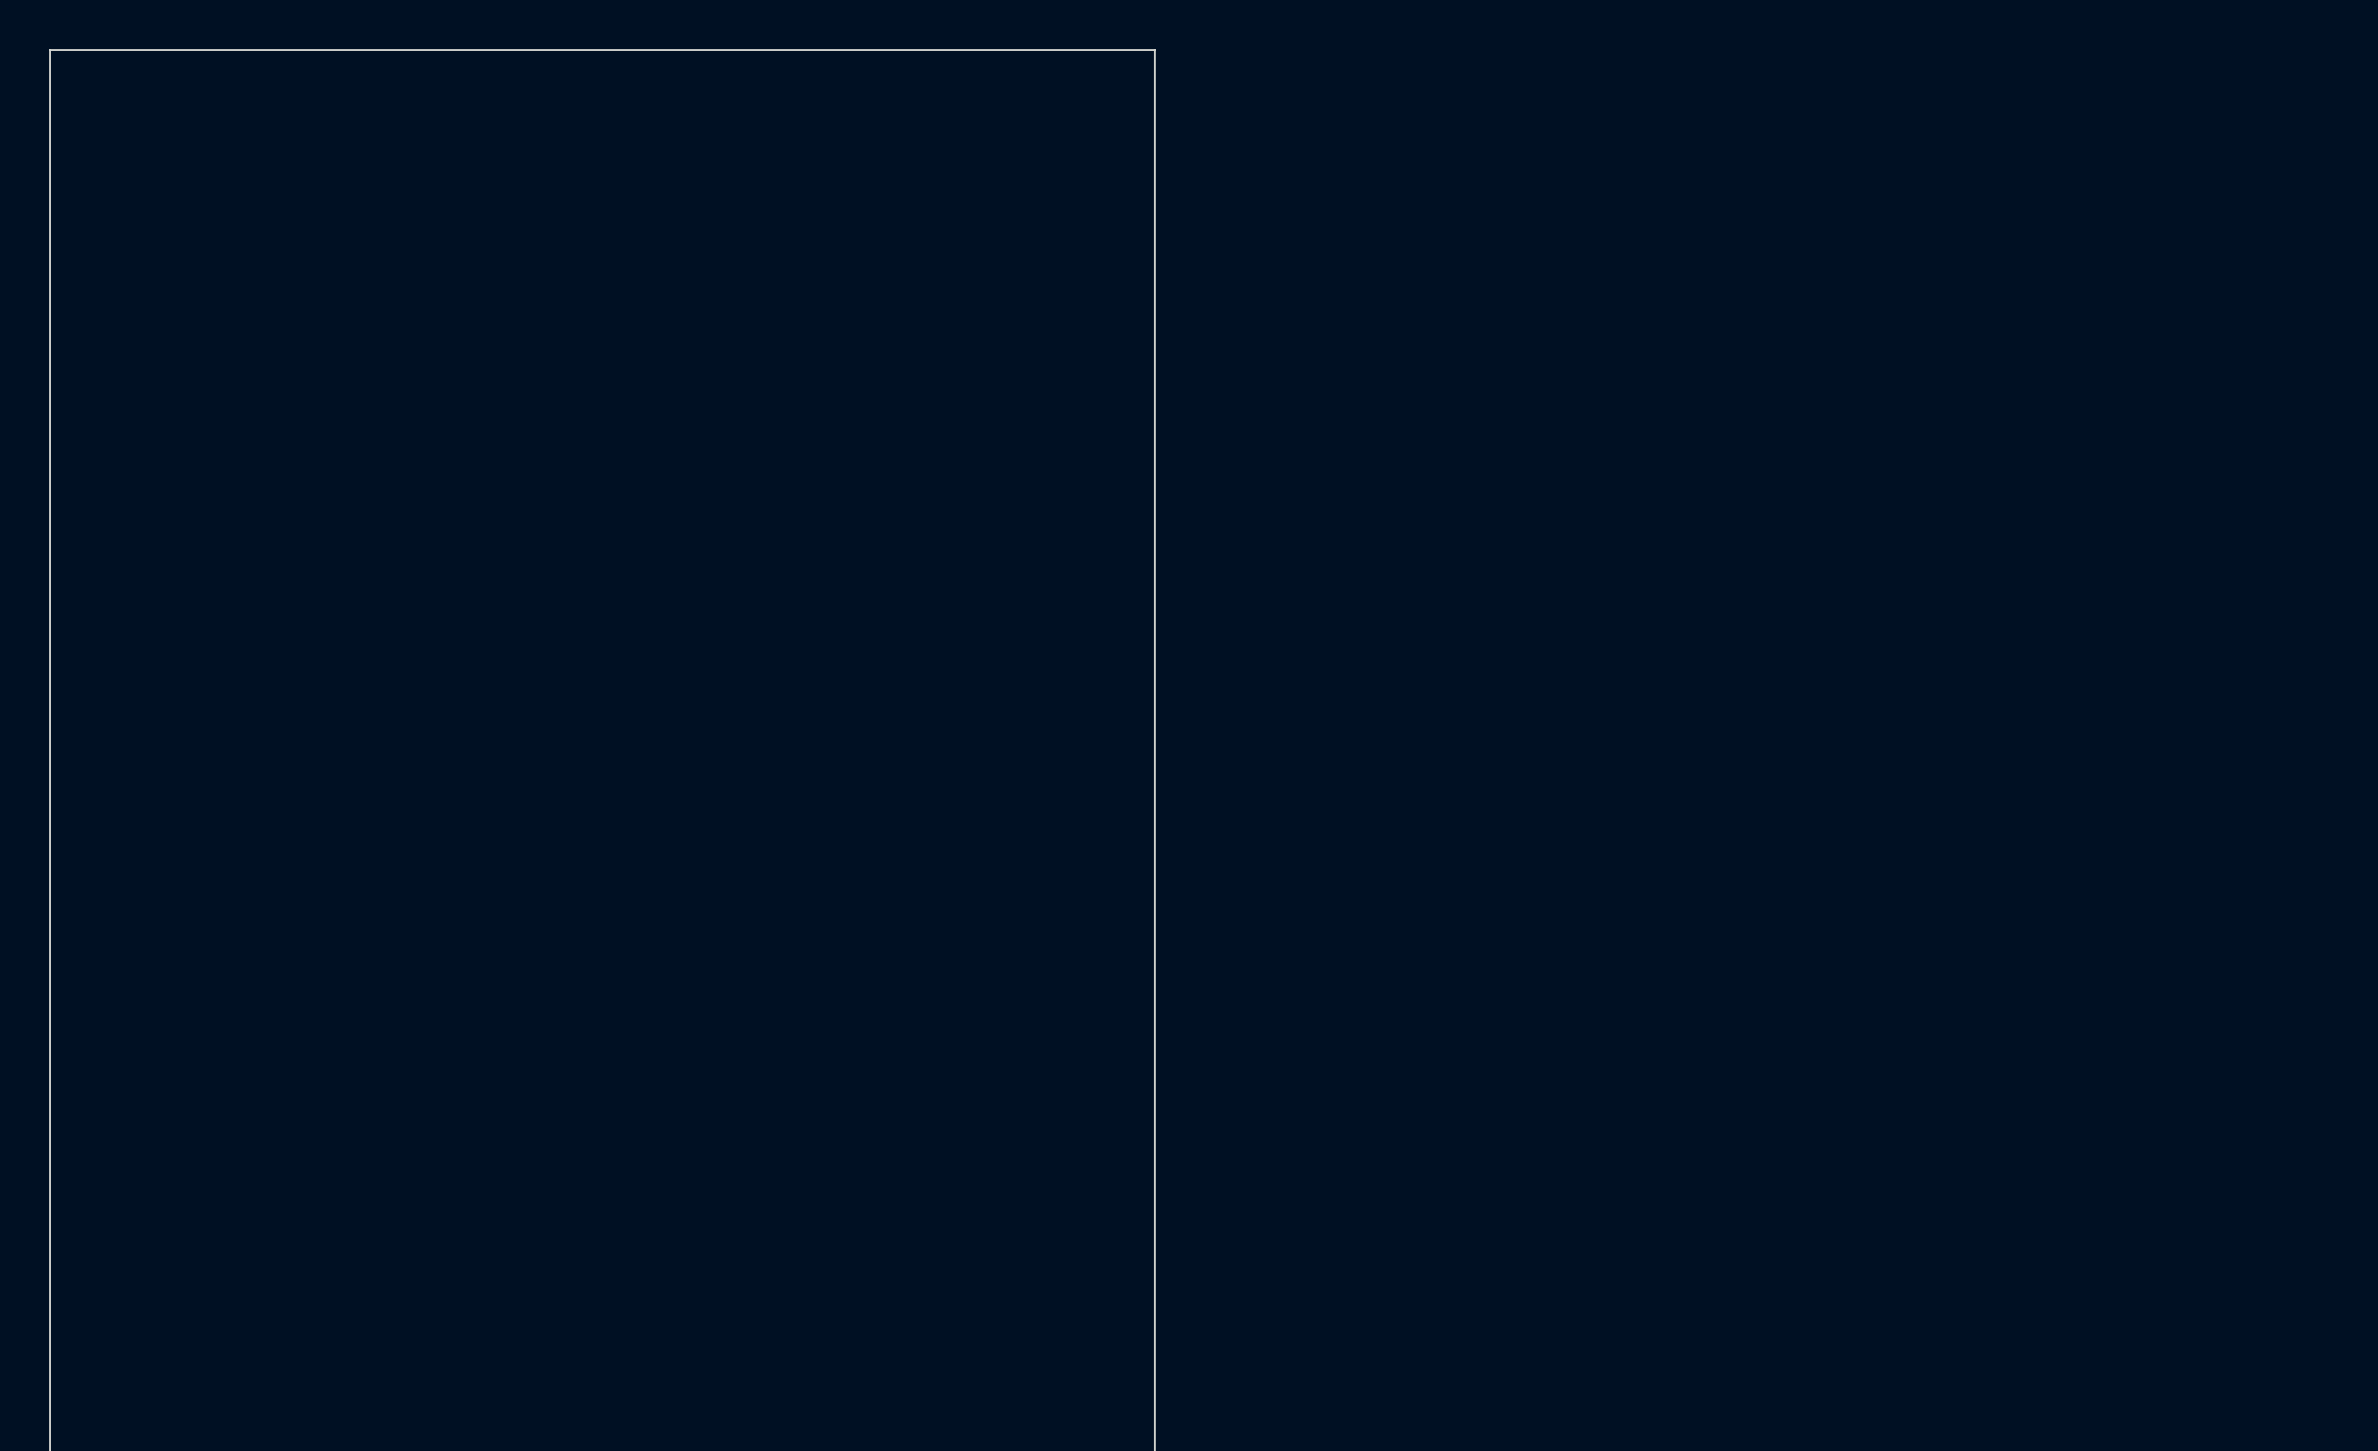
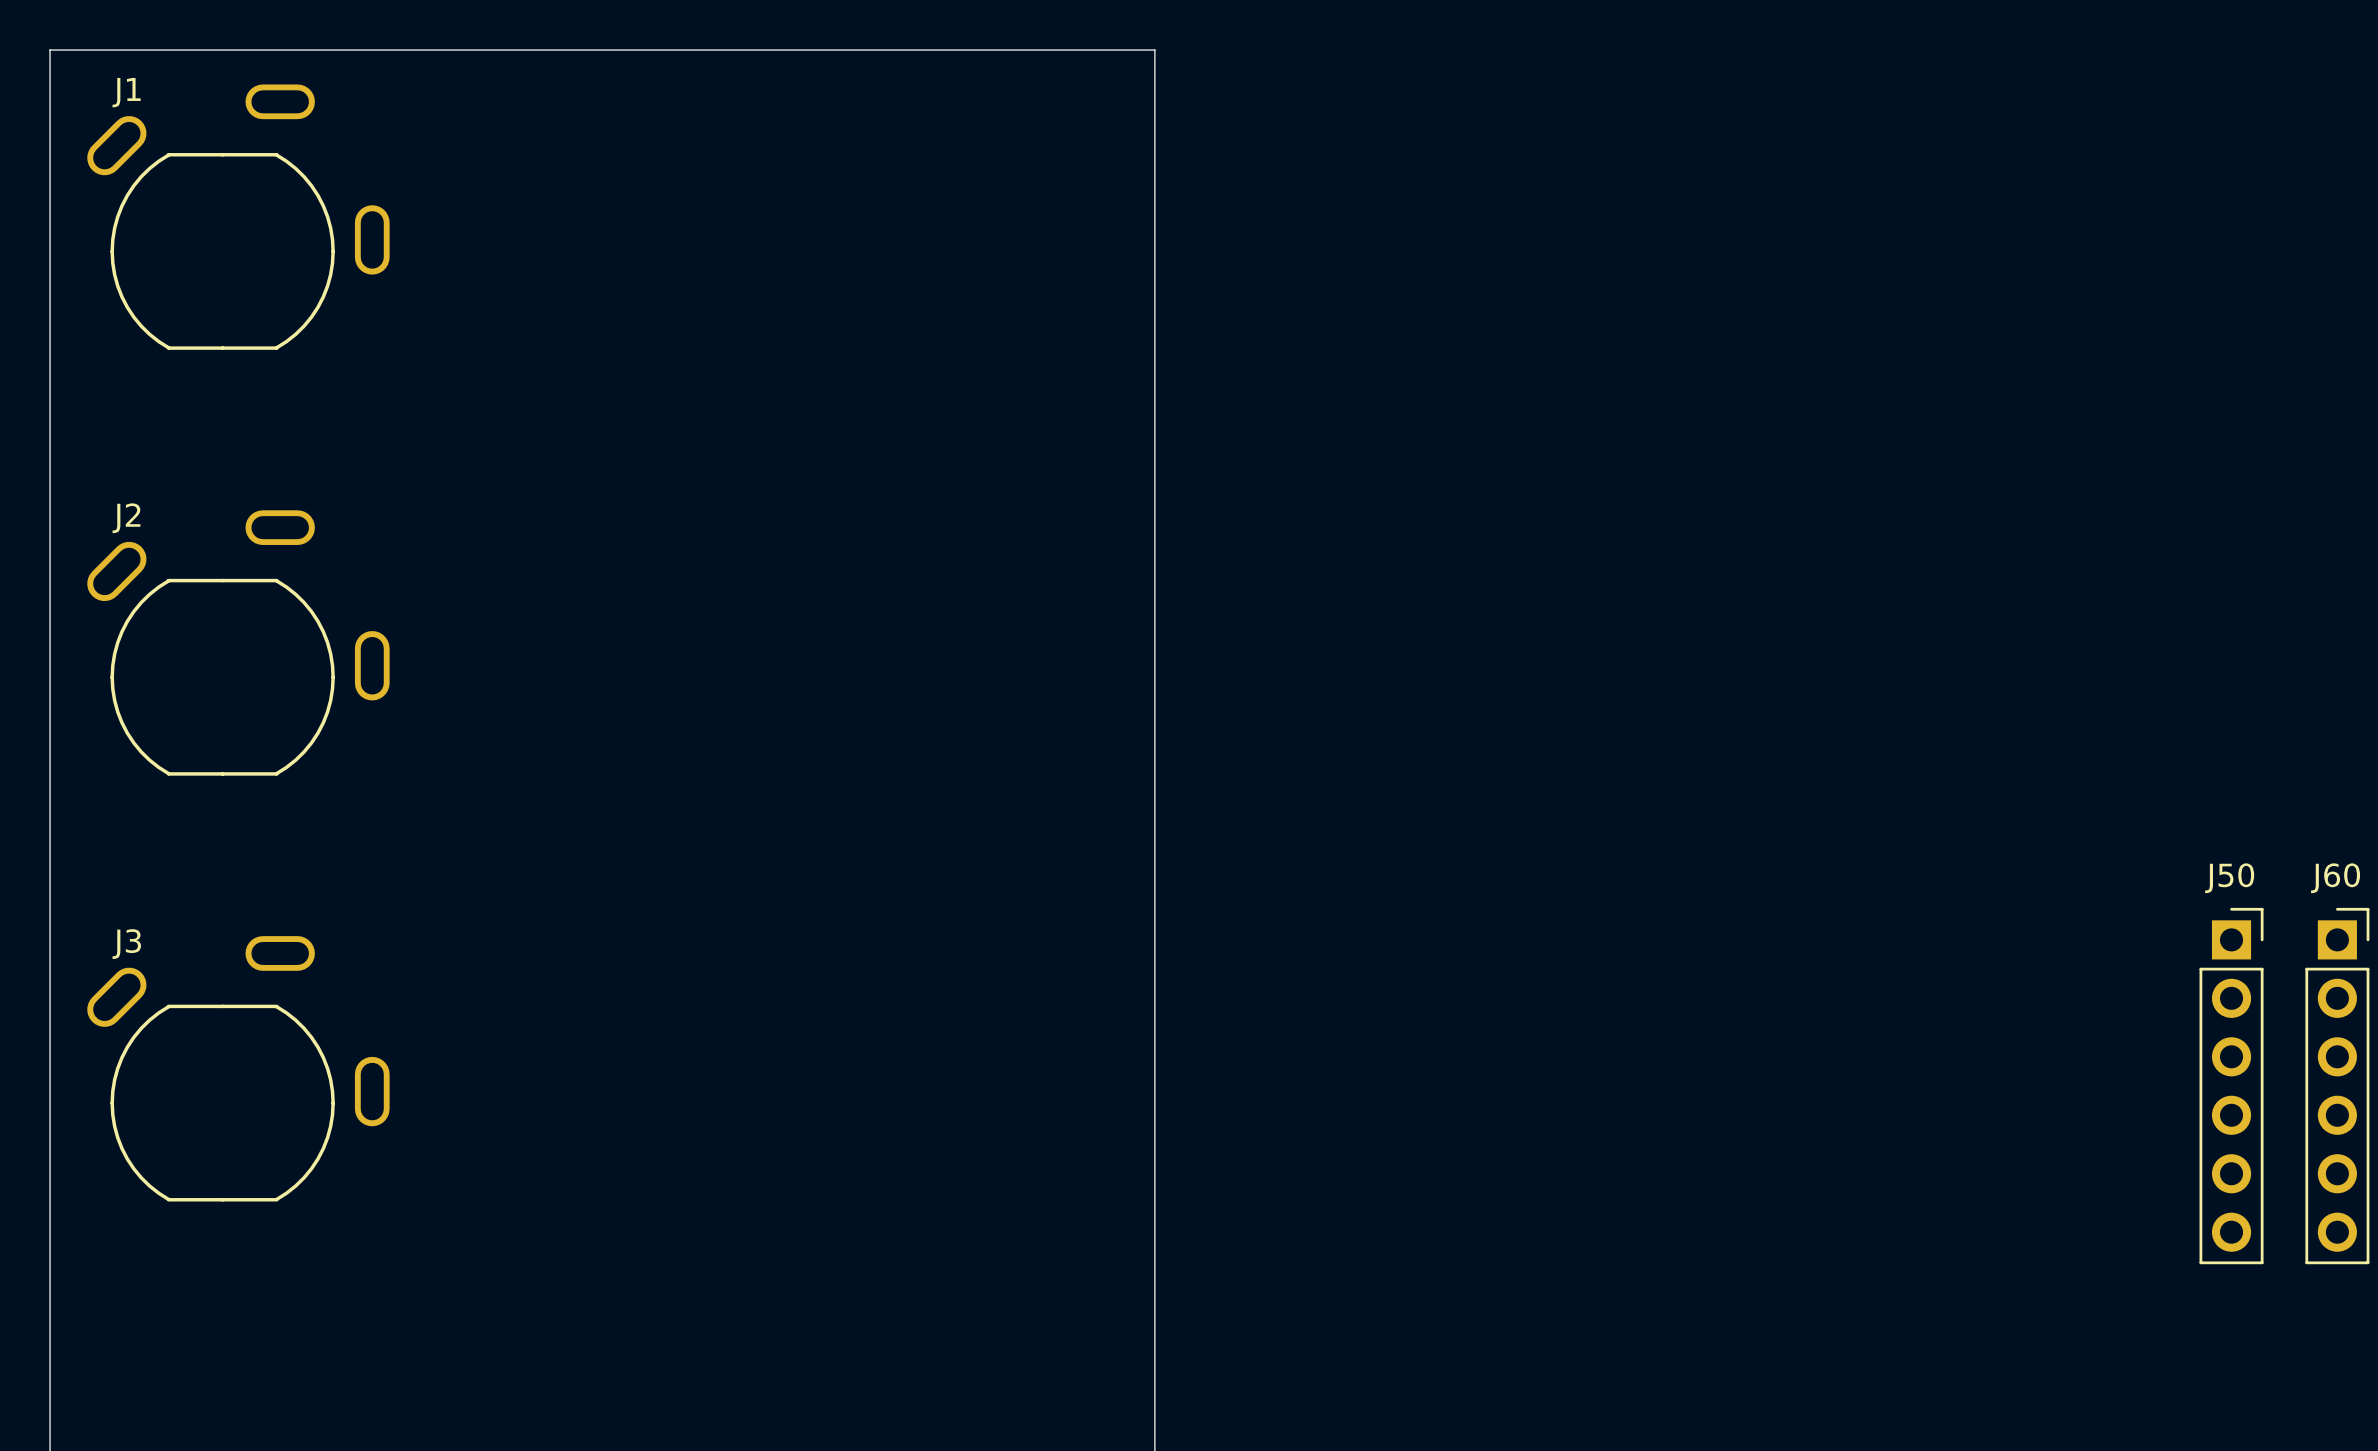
J1: none -> (238, 217)
J2: none -> (238, 642)
J3: none -> (238, 1068)
J50: none -> (2231, 1086)
J60: none -> (2337, 1086)

